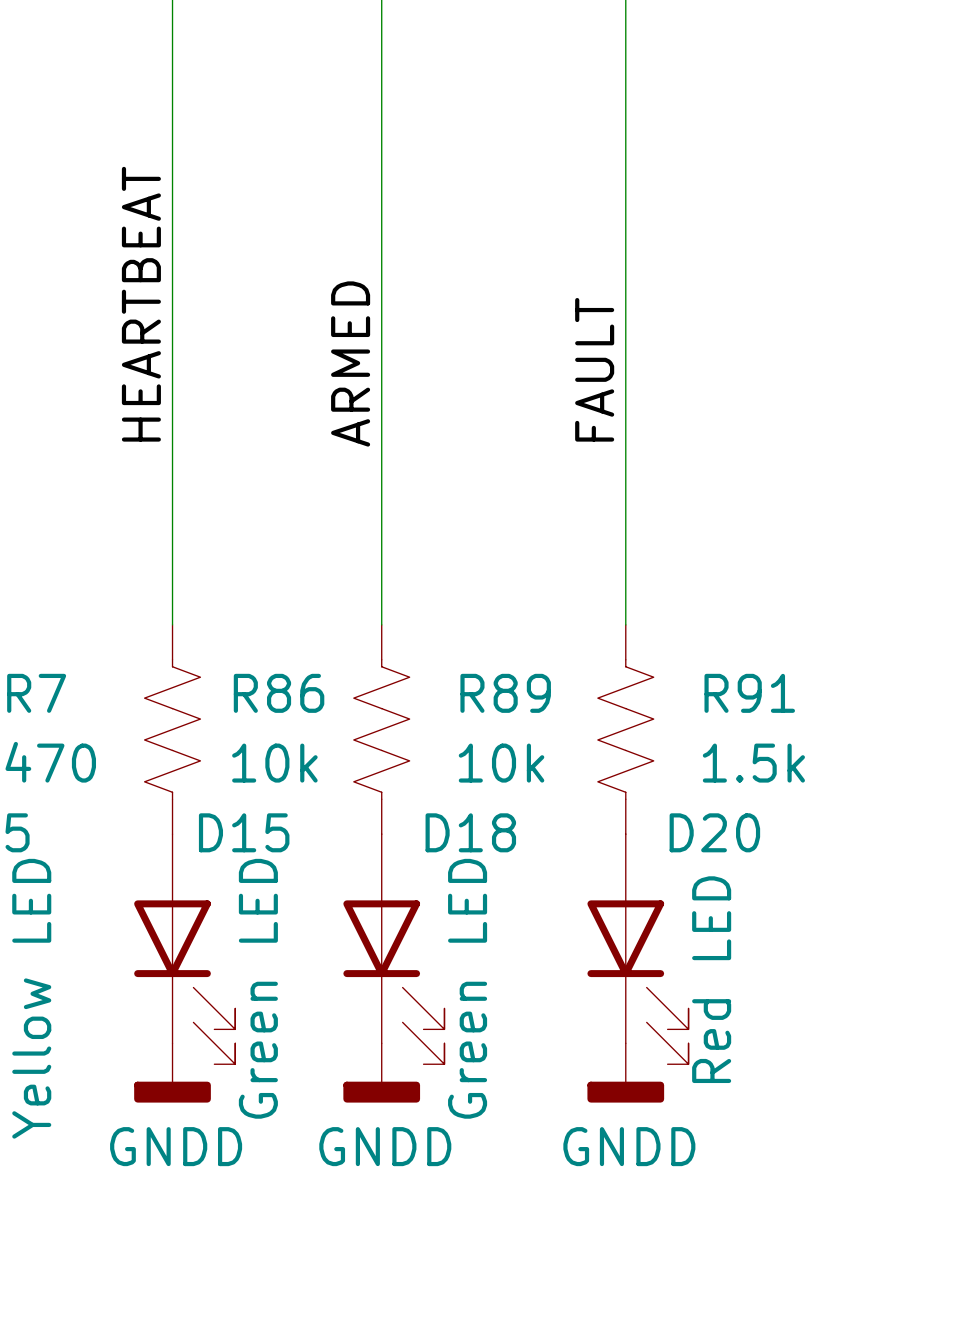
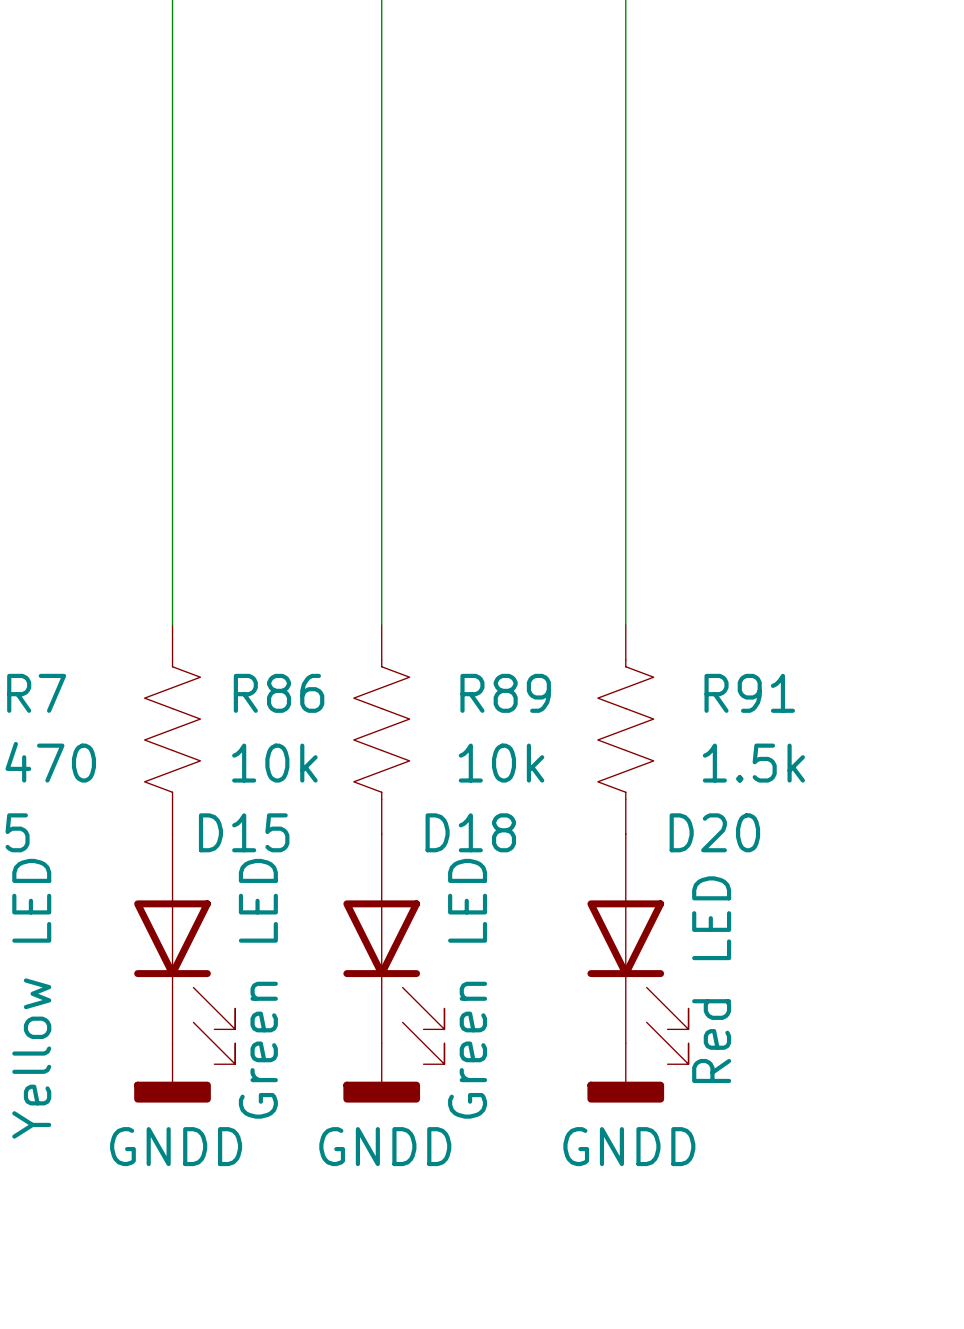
label: HEARTBEAT (141, 304) -> none
label: ARMED (350, 363) -> none
label: FAULT (594, 369) -> none

